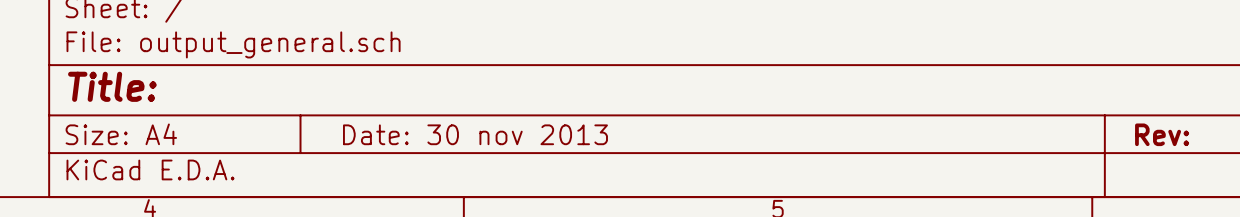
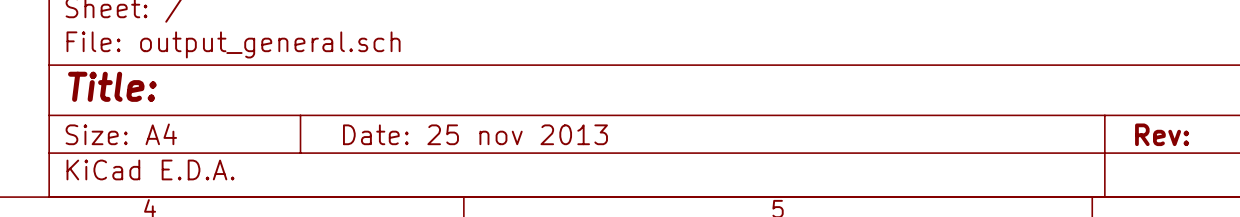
title block: Date: 30 nov 2013 (475, 134) -> Date: 25 nov 2013 (475, 134)

